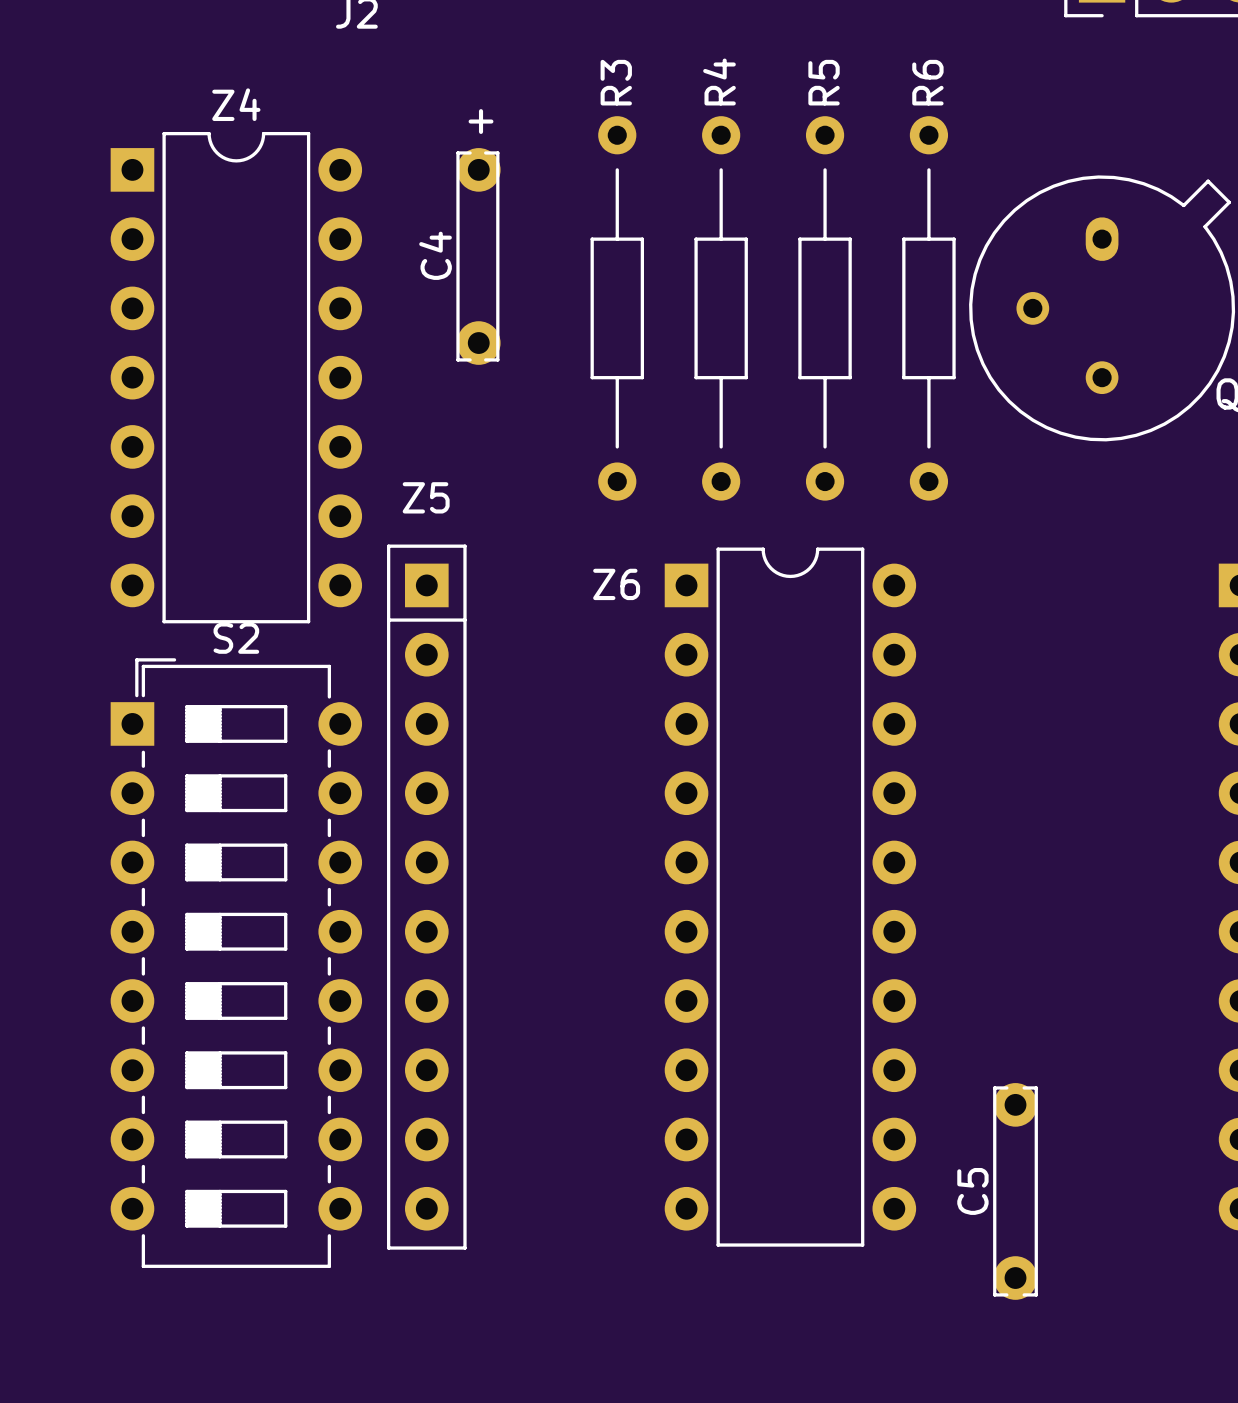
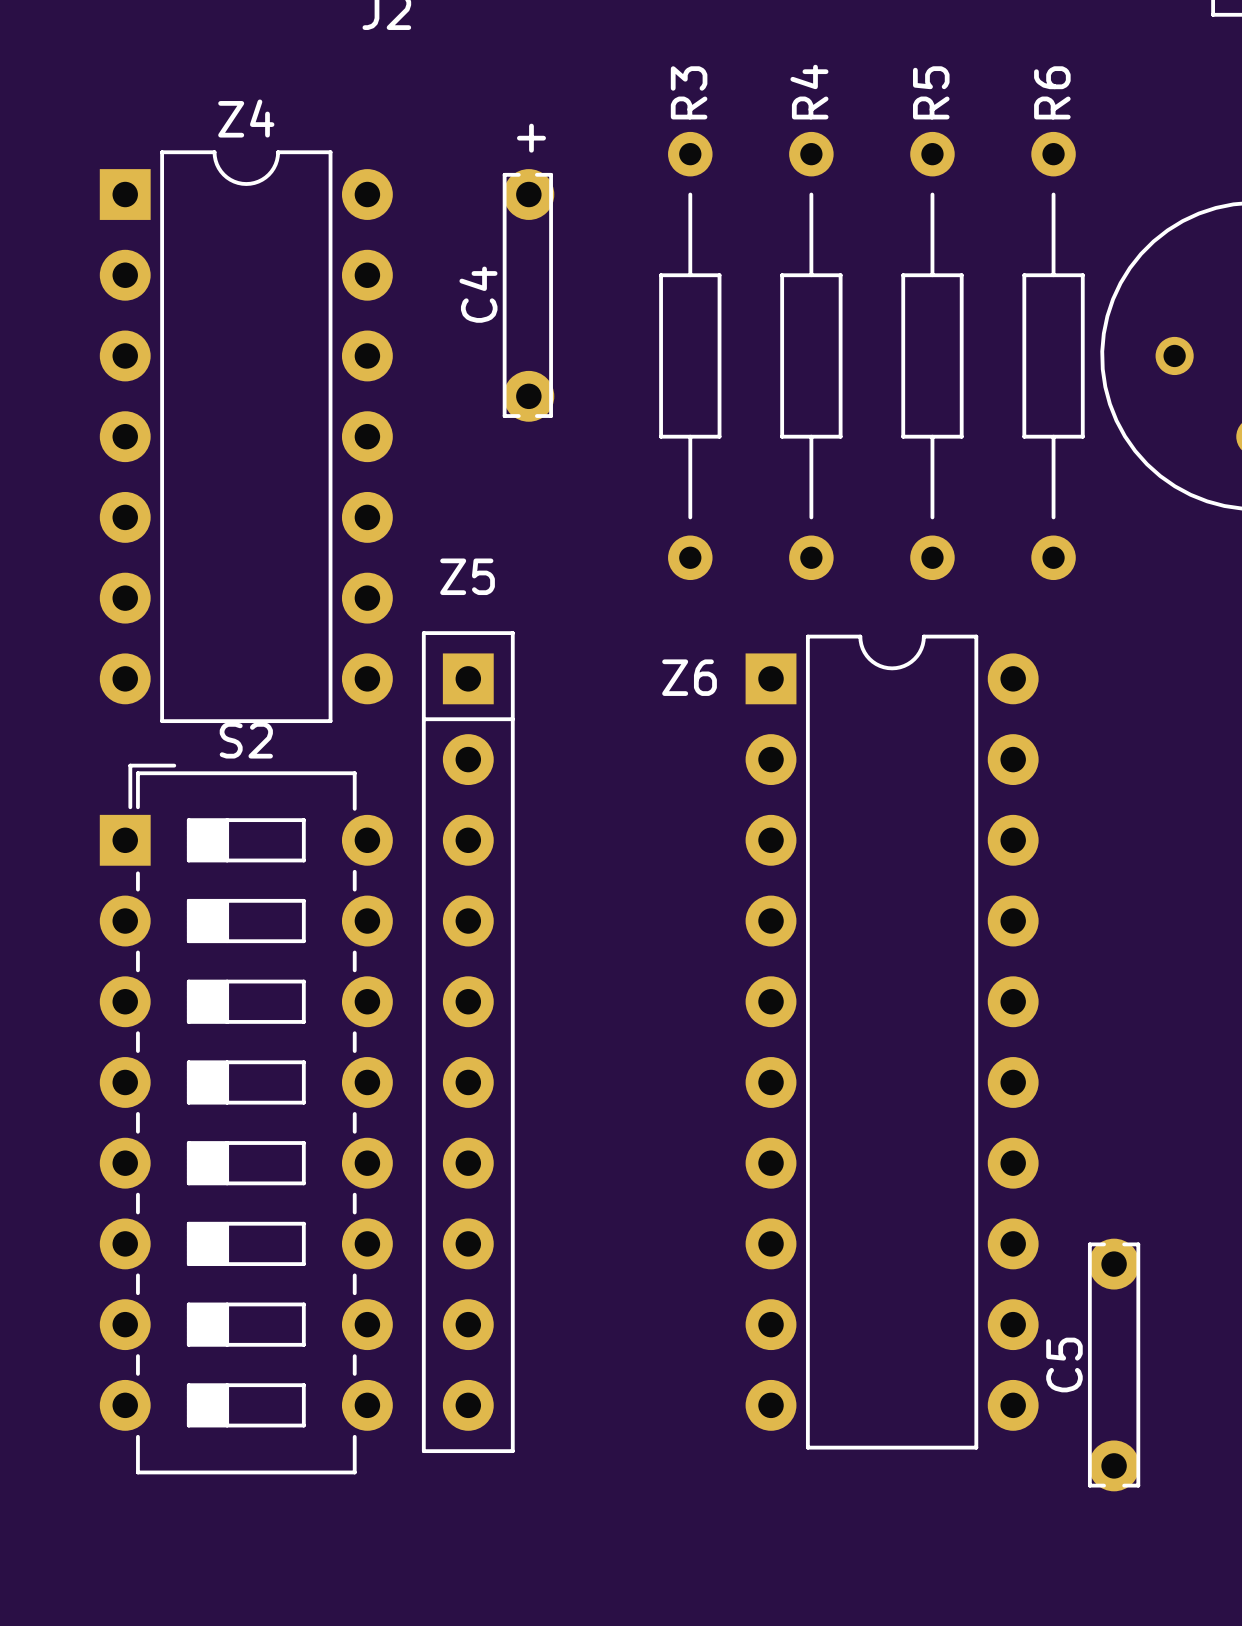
C5 position: (1015, 1191) -> (1114, 1365)

